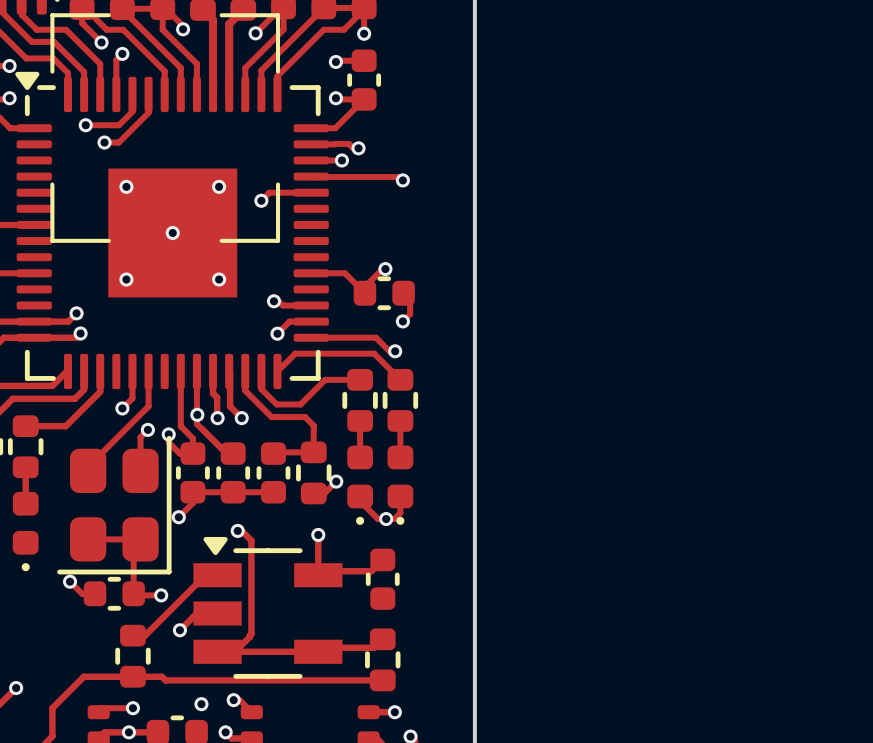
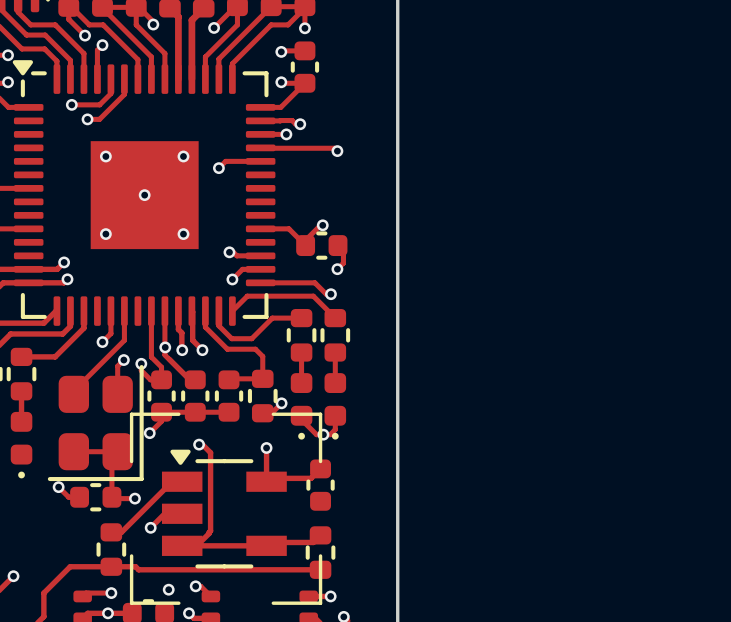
drawing position: (165, 128) -> (226, 508)

